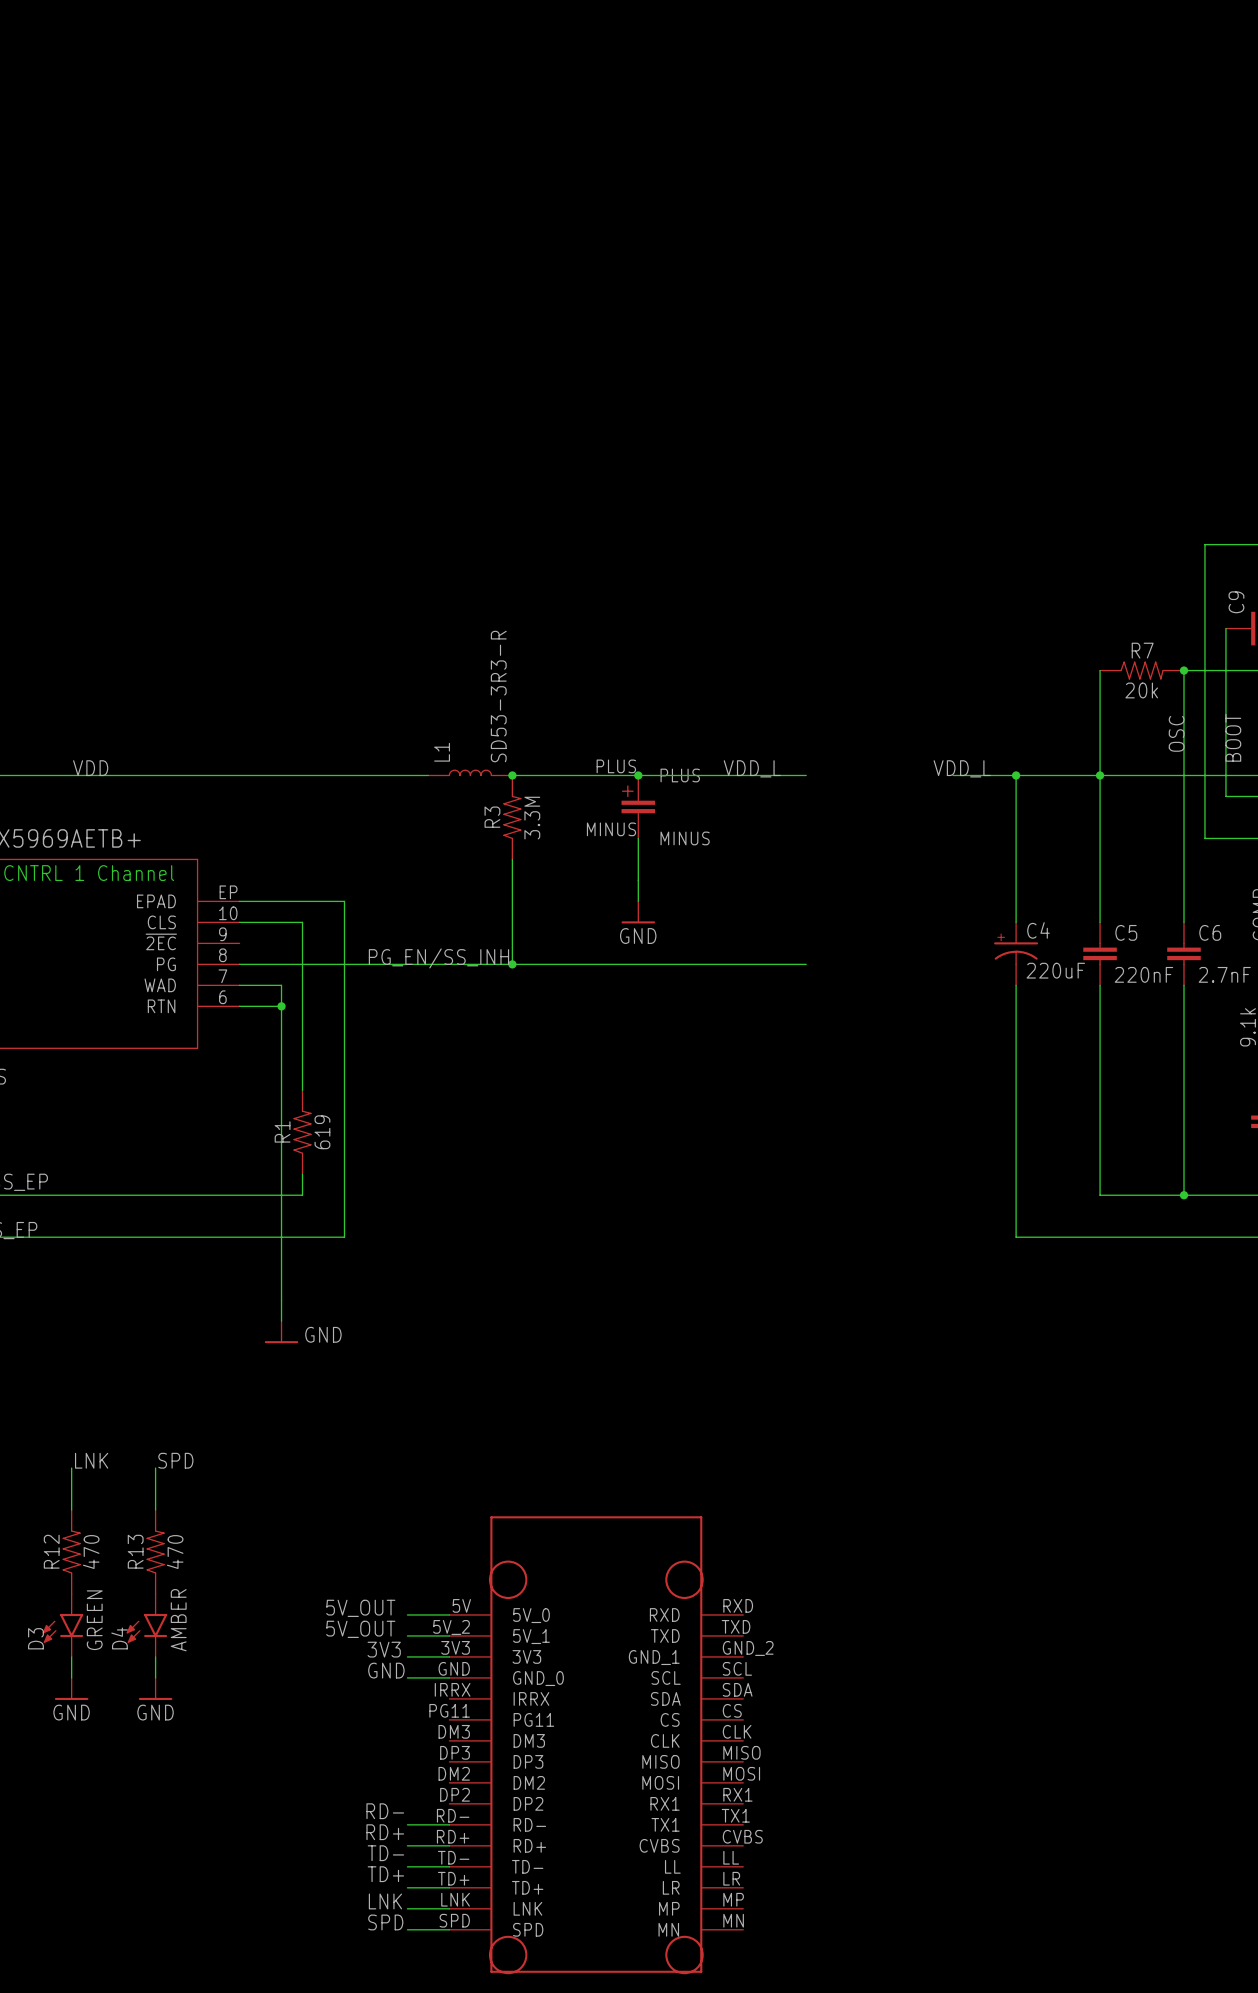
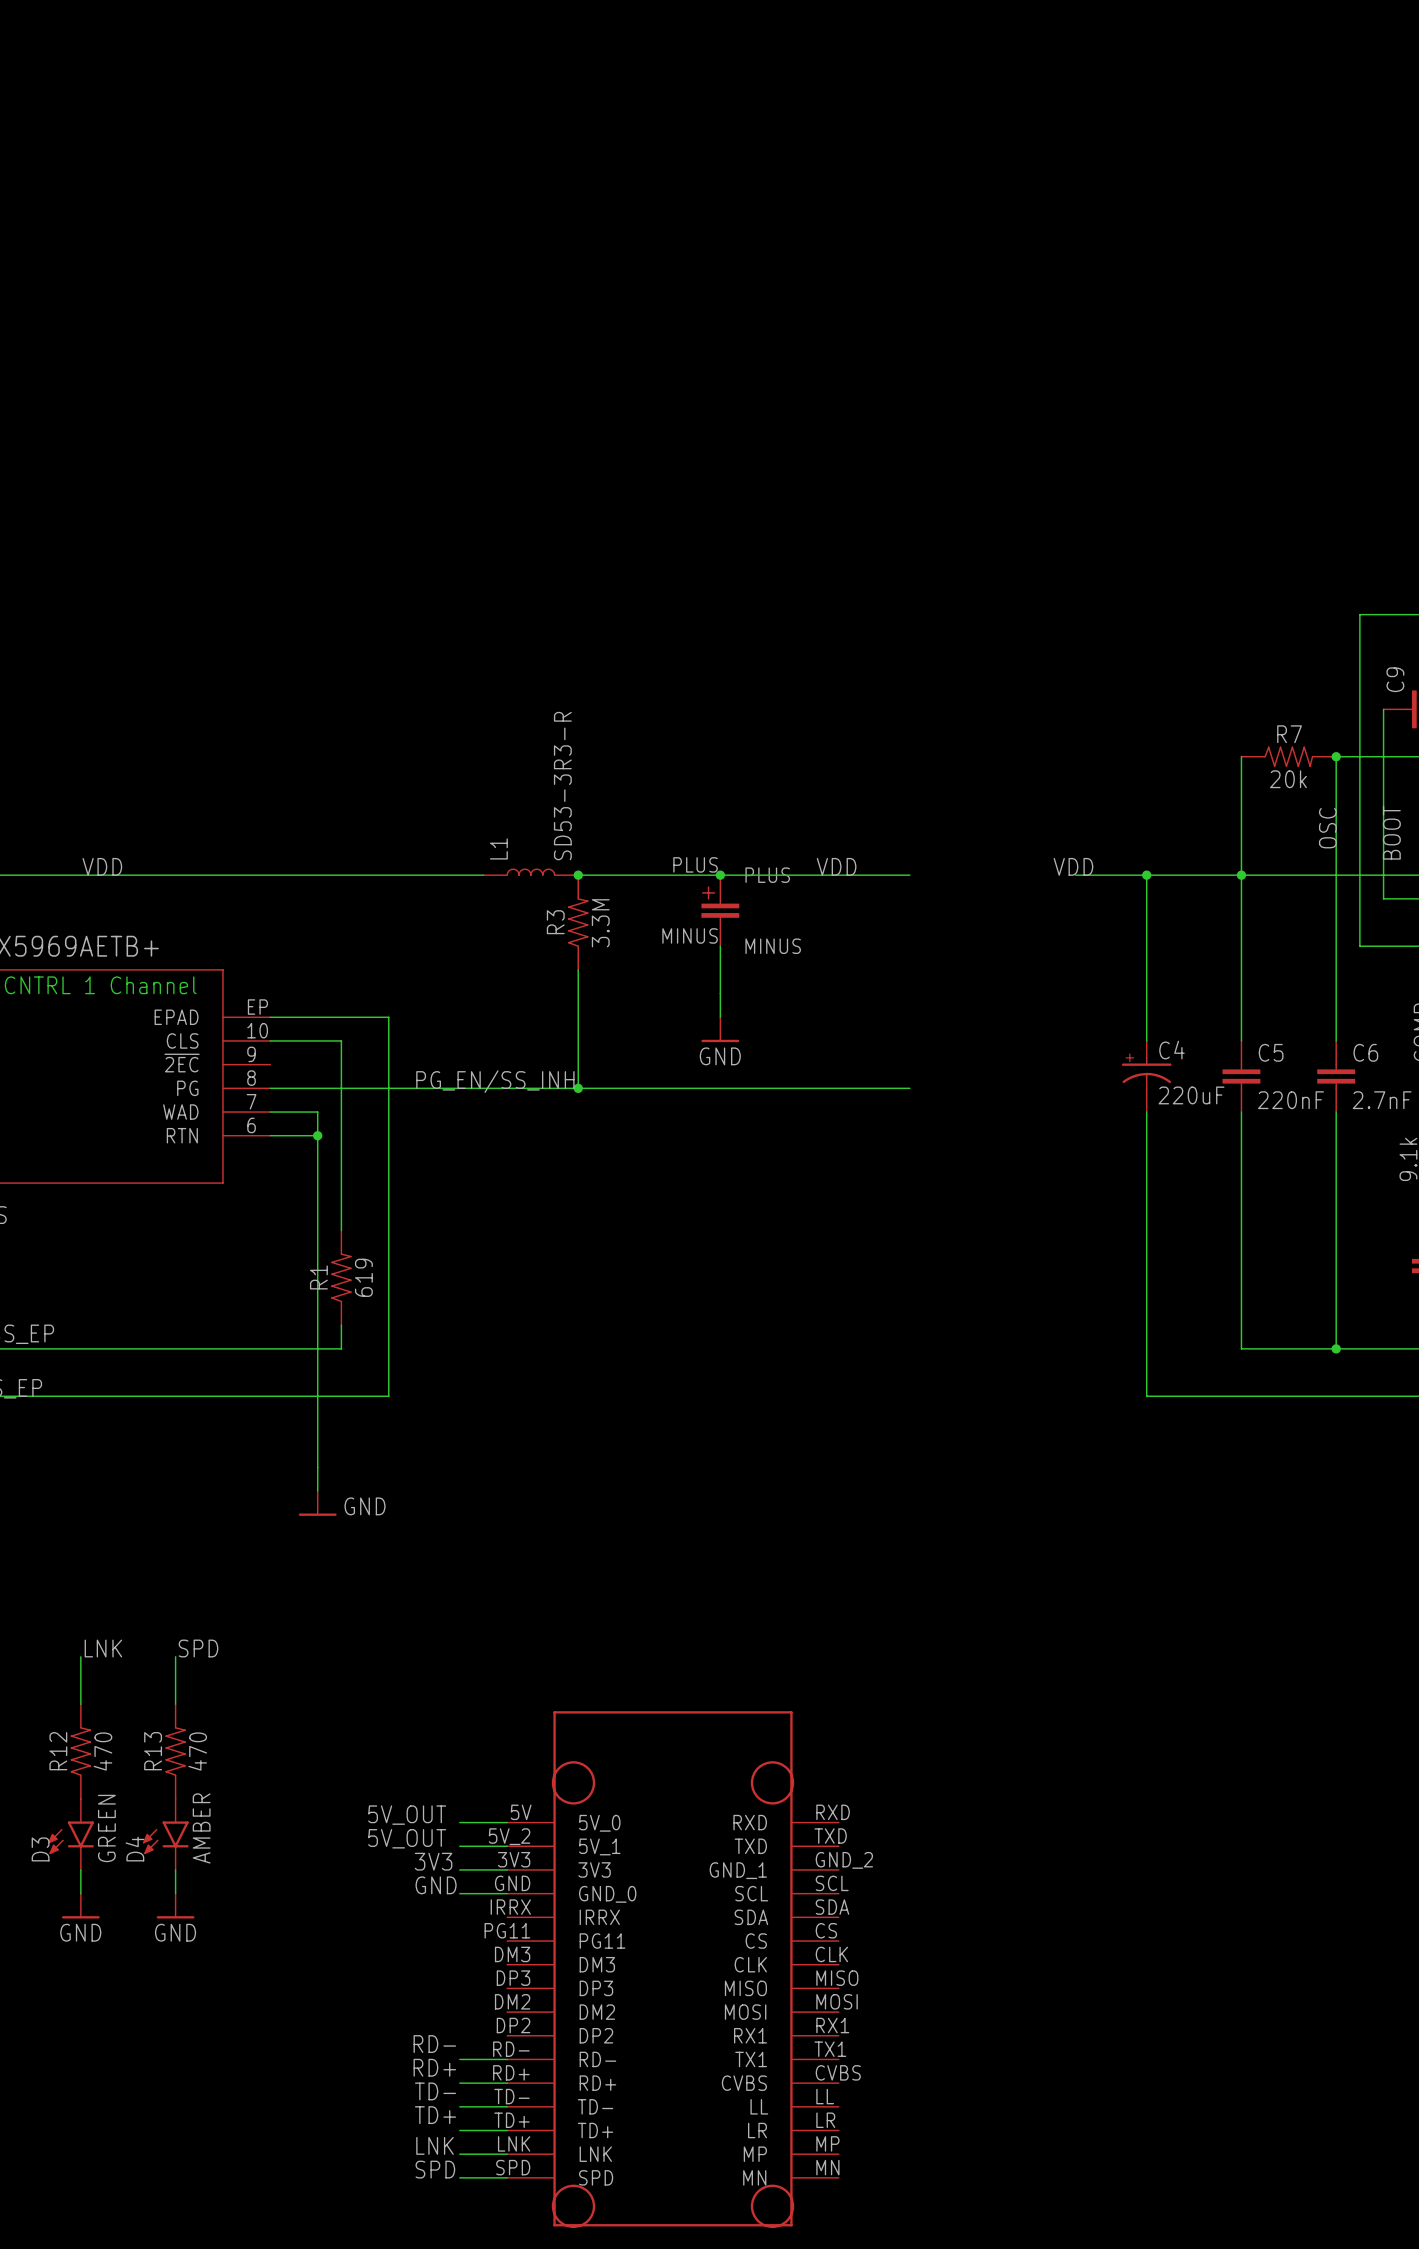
label: VDD_L (752, 768) -> VDD (836, 866)
label: VDD_L (962, 768) -> VDD (1073, 866)

